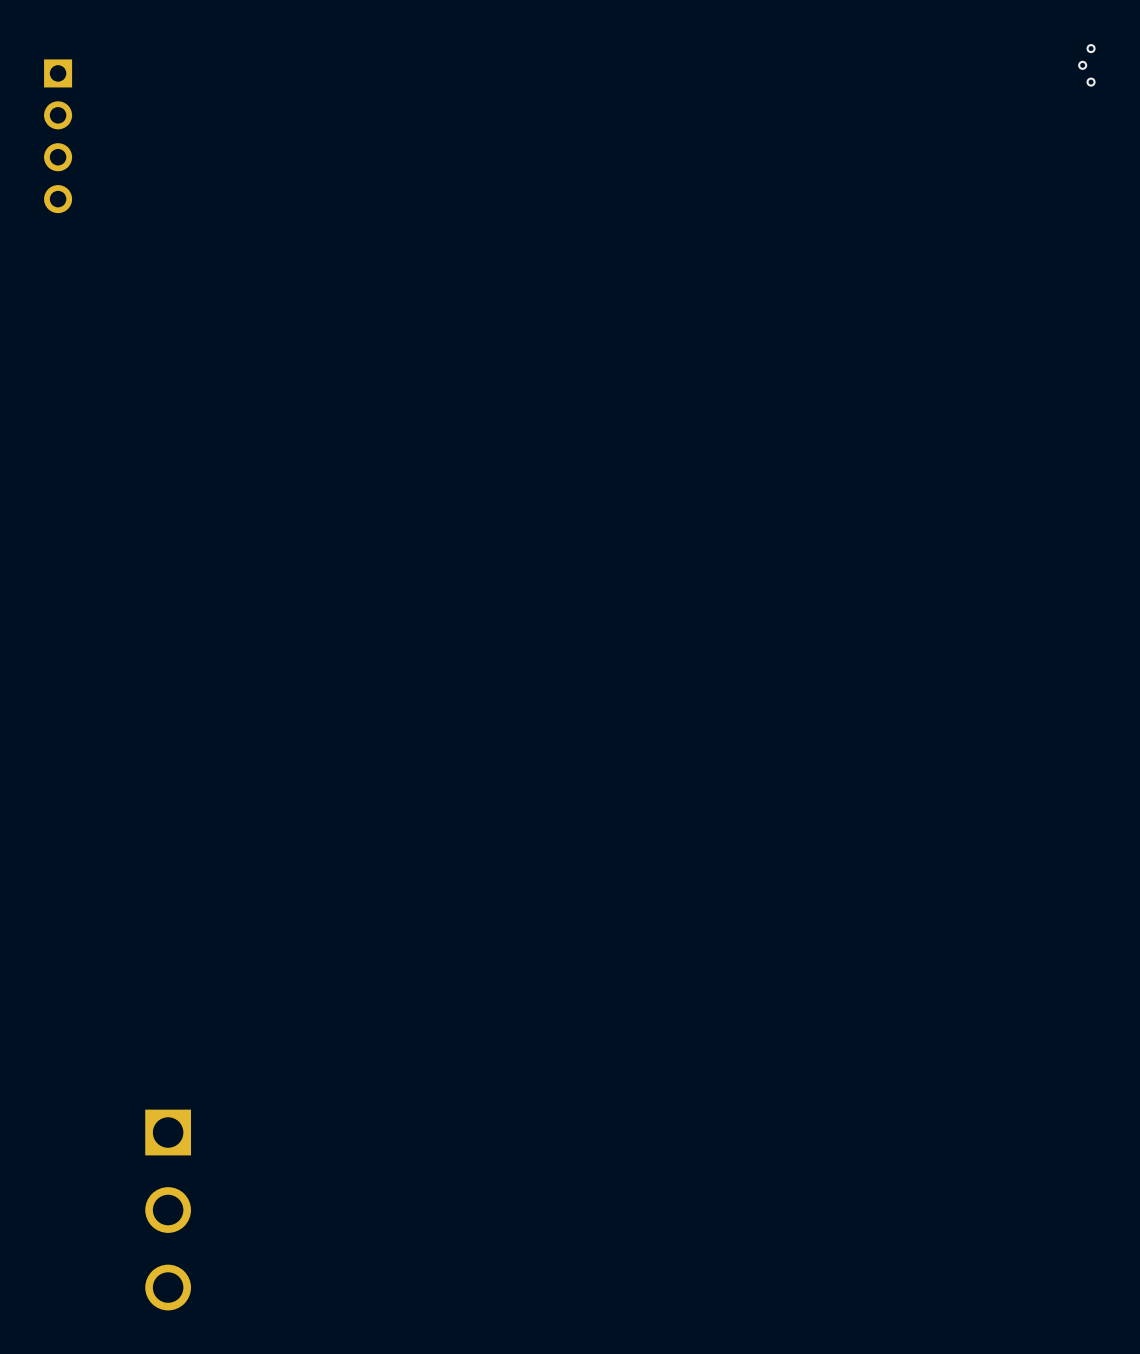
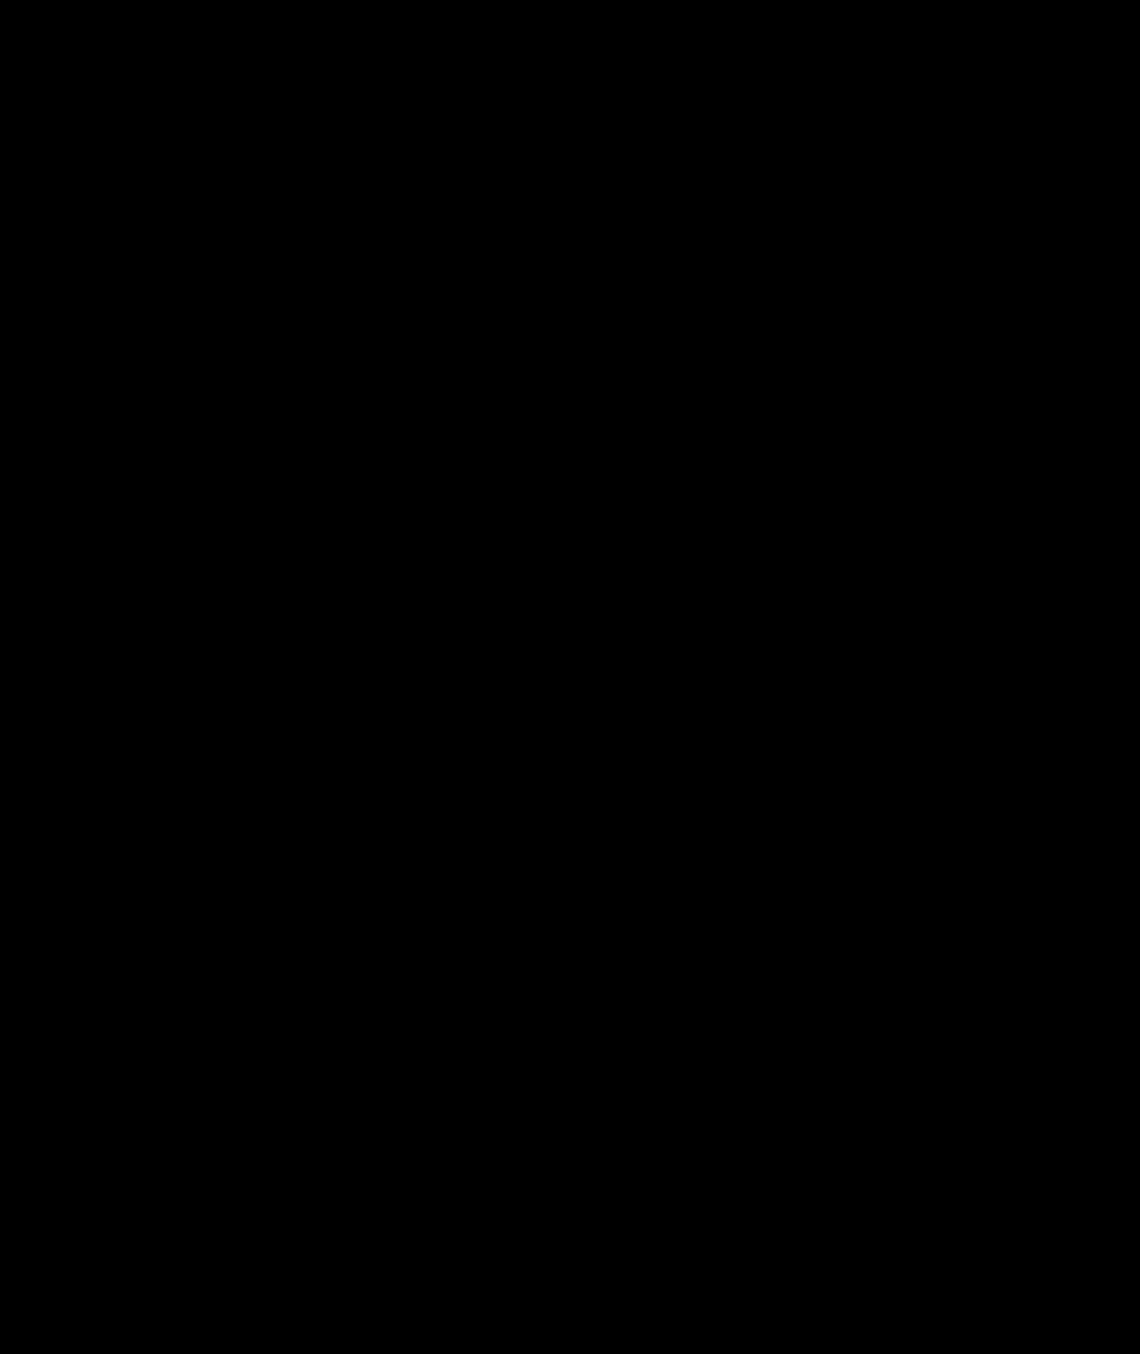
via: (1091, 48) -> none
via: (1082, 65) -> none
via: (1091, 82) -> none
part: (58, 136) -> none
part: (168, 1210) -> none

